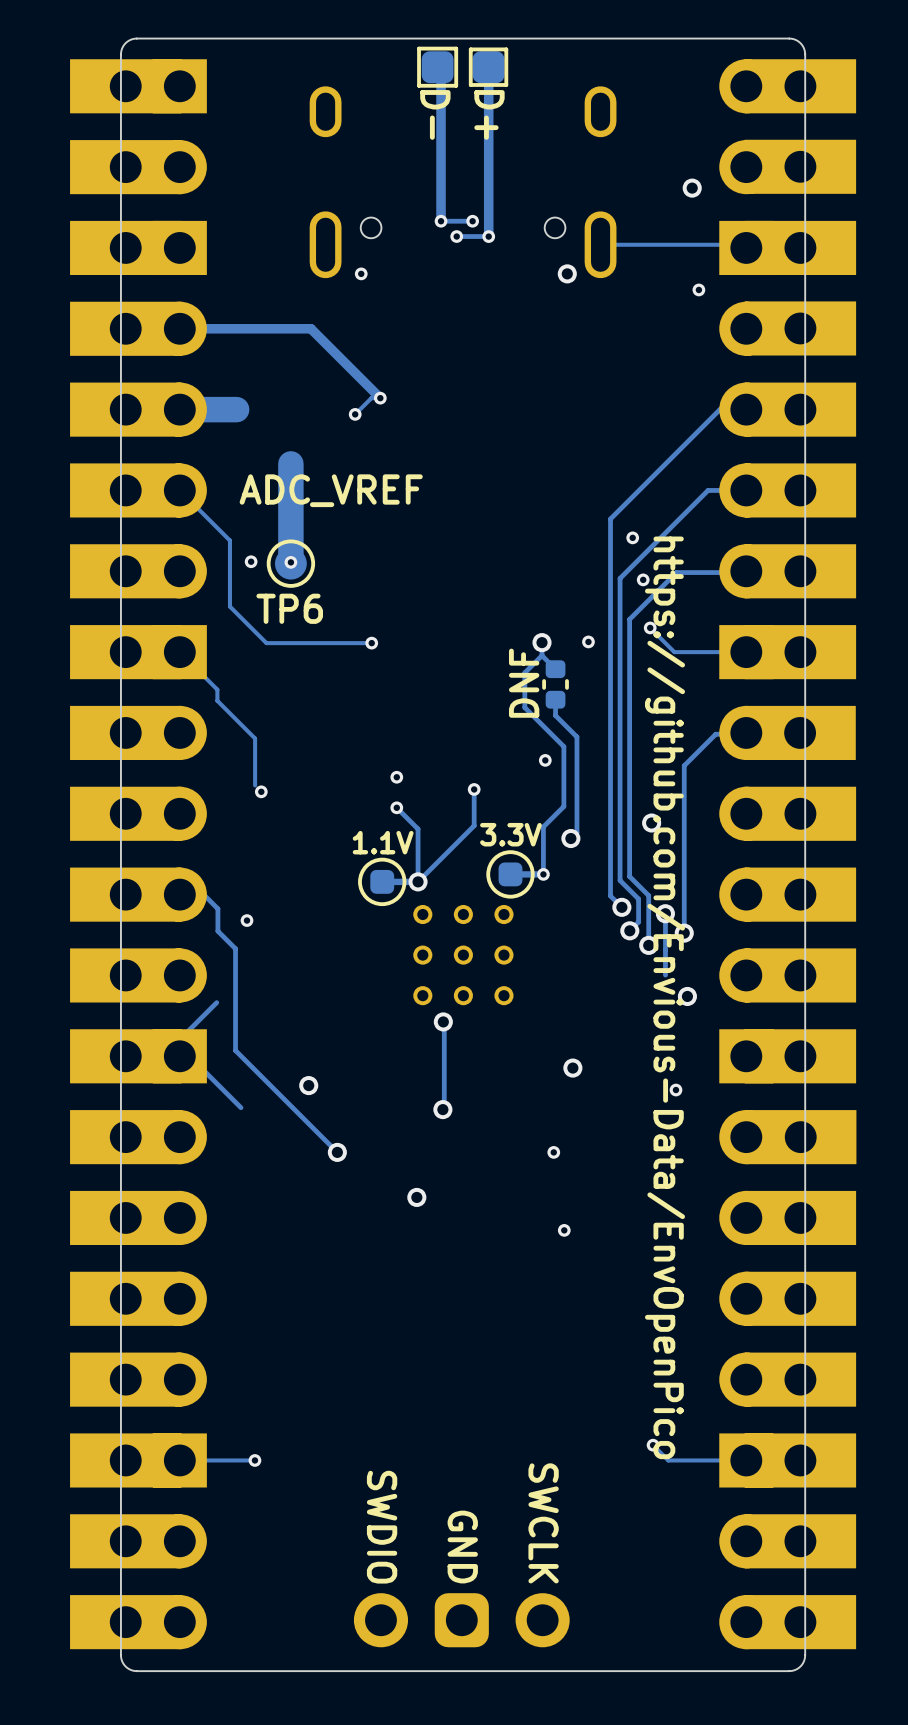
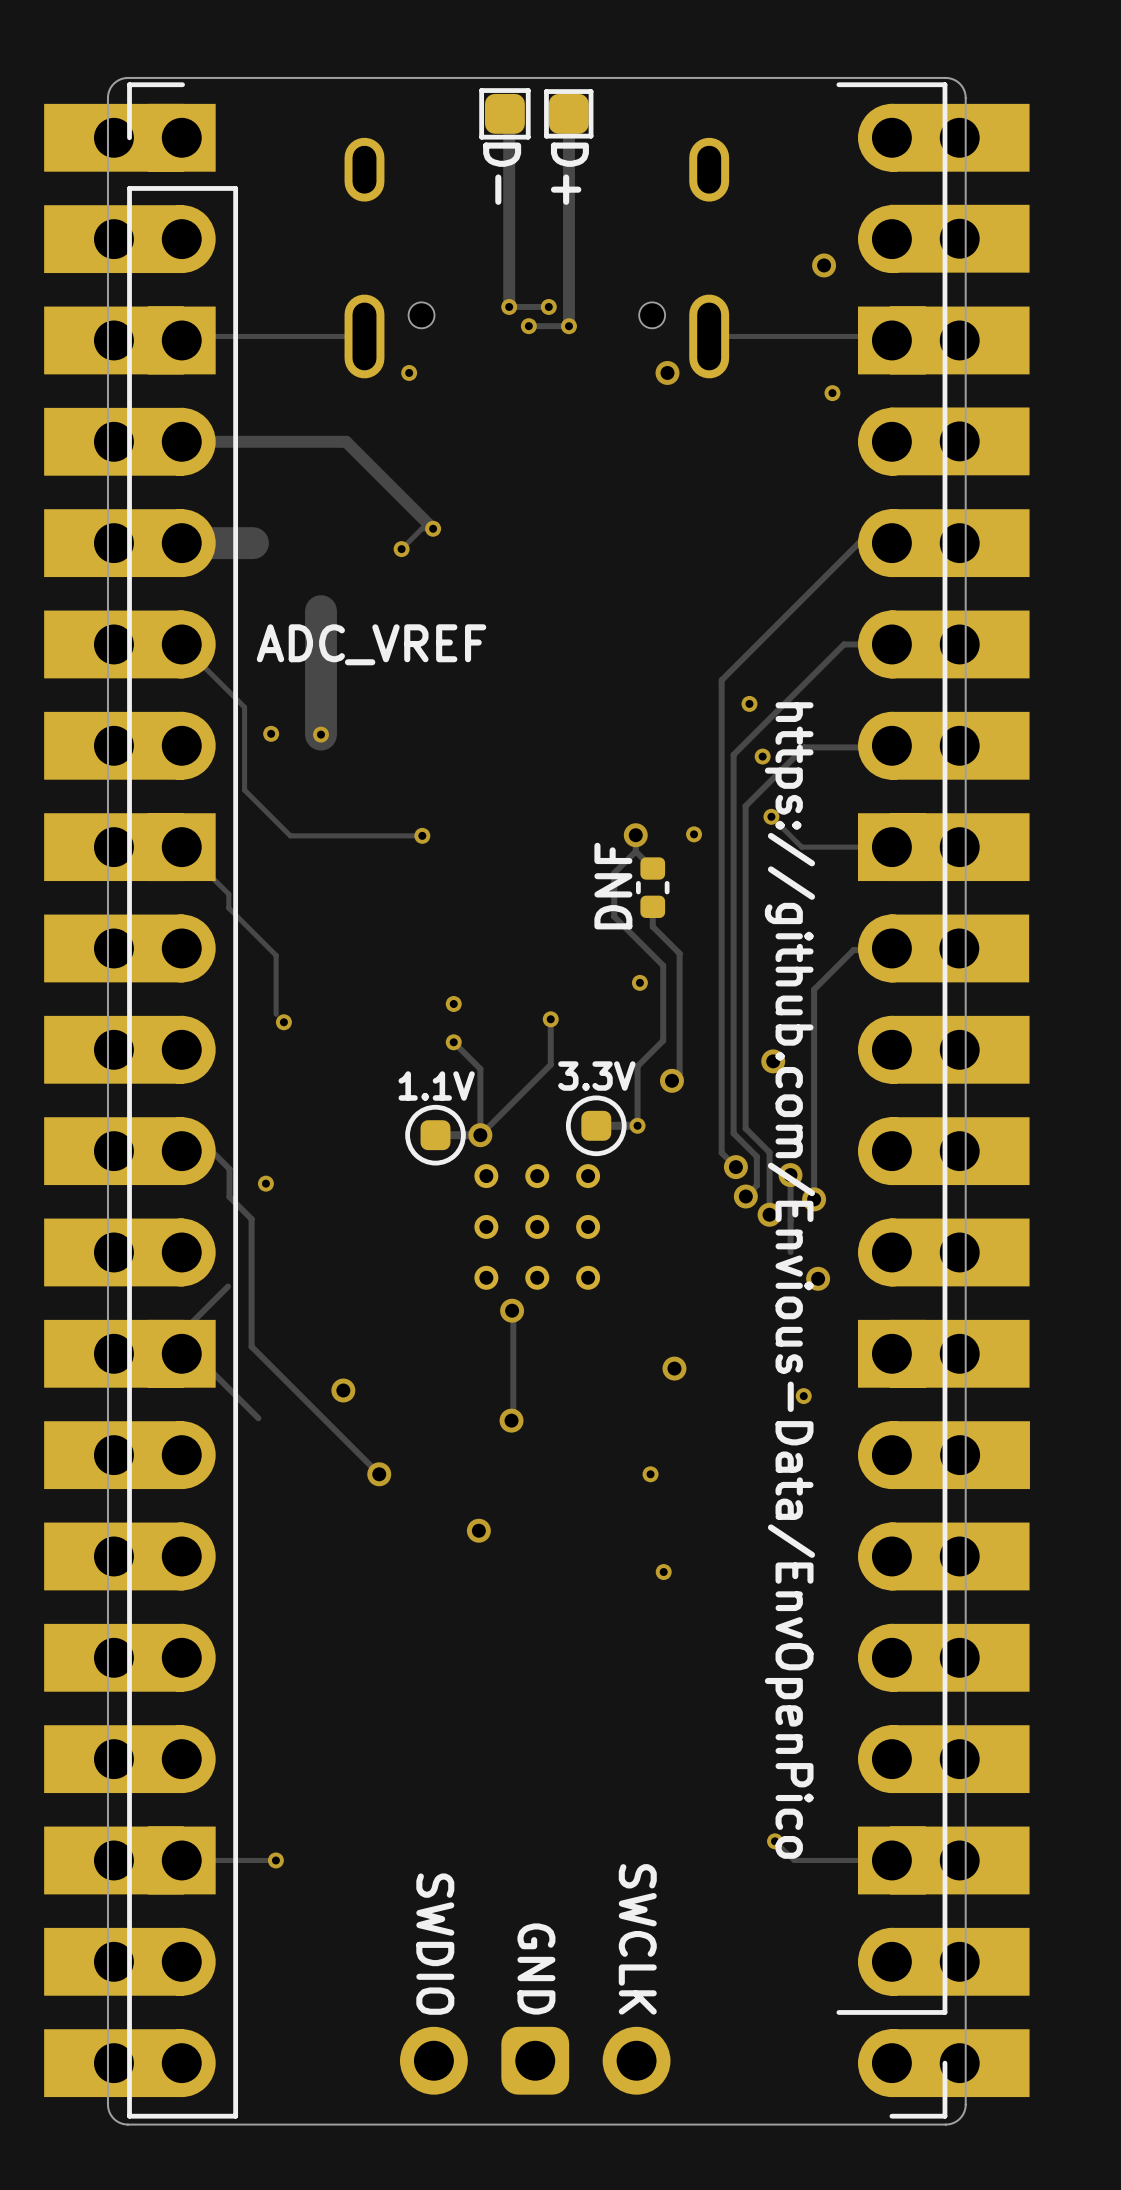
part footprint: [70, 59, 207, 1650] -> [44, 82, 239, 2119]
part footprint: [719, 59, 857, 1650] -> [836, 82, 1030, 2119]
track: none -> (366, 336) (124, 336)
TP6: (290, 563) -> none

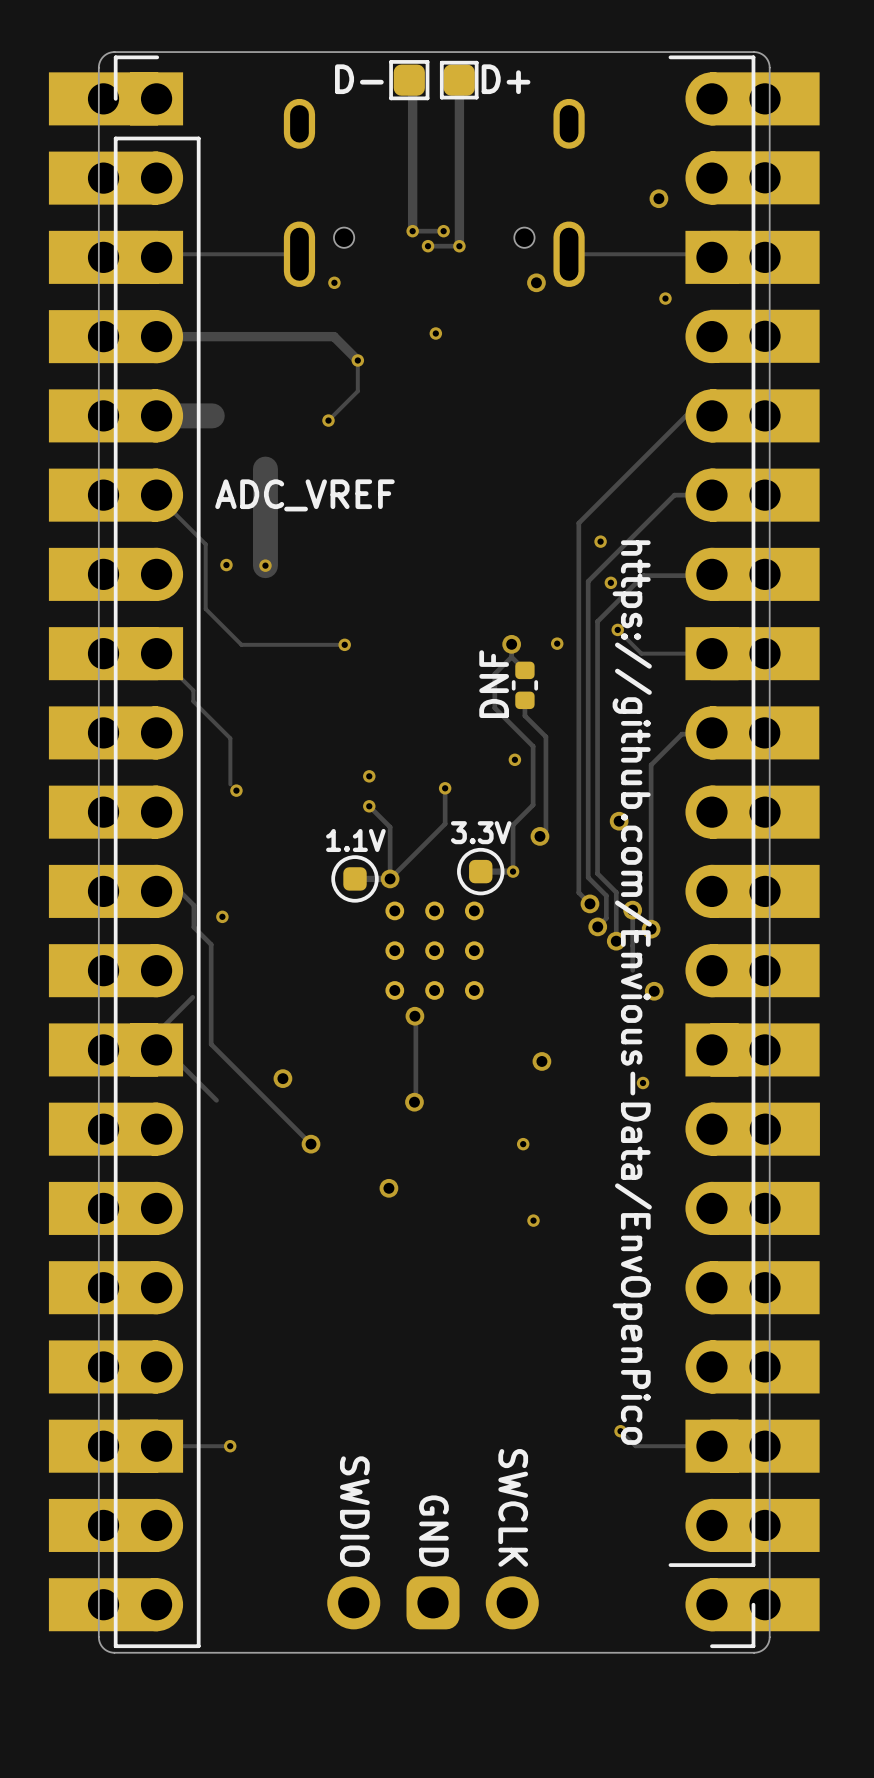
text rotation: 0° (502, 173) -> 90° counterclockwise (359, 79)
text rotation: 0° (569, 173) -> 90° counterclockwise (506, 79)
via: none -> (435, 333)
track: (346, 441) (433, 528) -> (285, 336) (333, 336) (357, 360) (357, 391) (344, 404)
via position: (433, 528) -> (357, 360)

